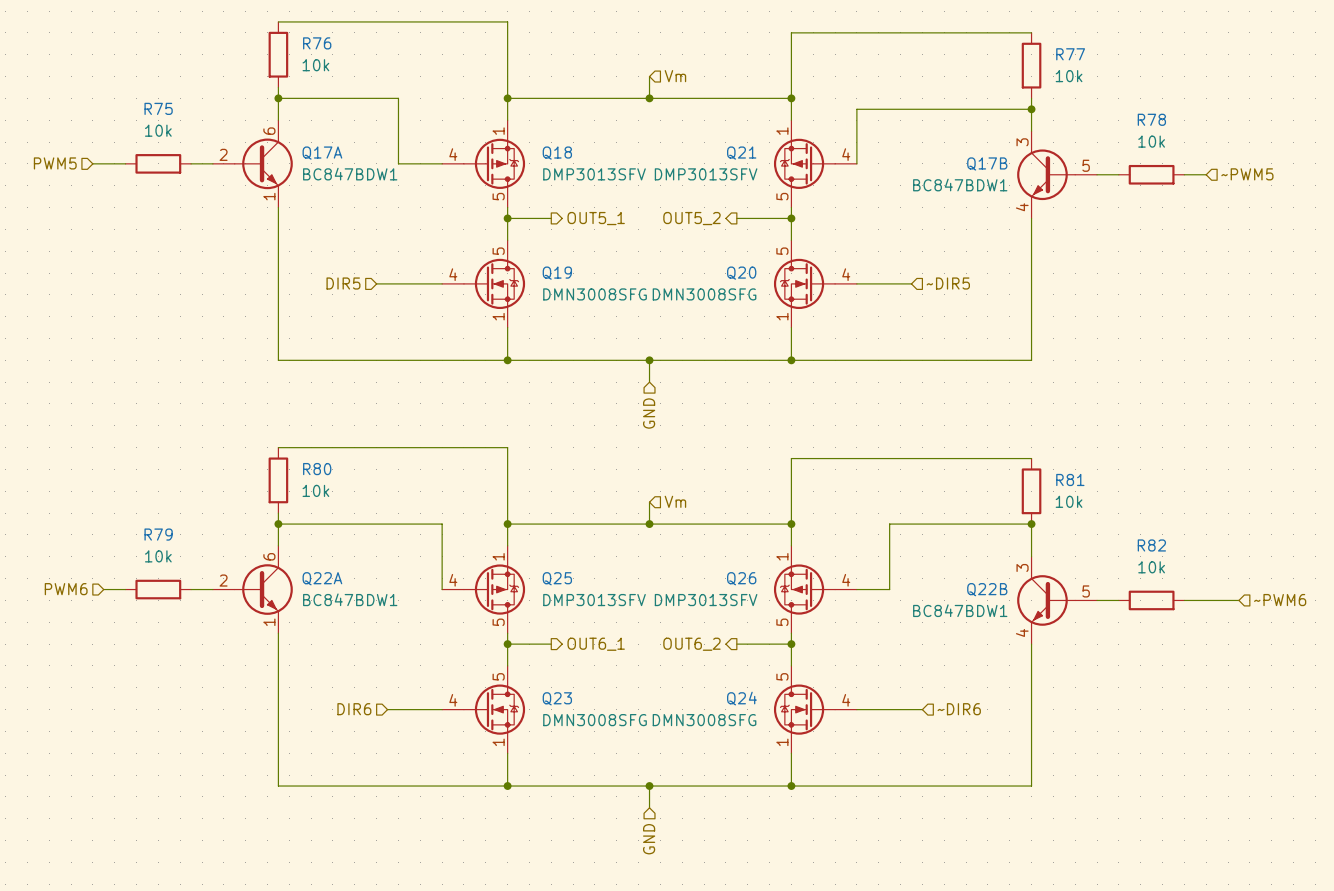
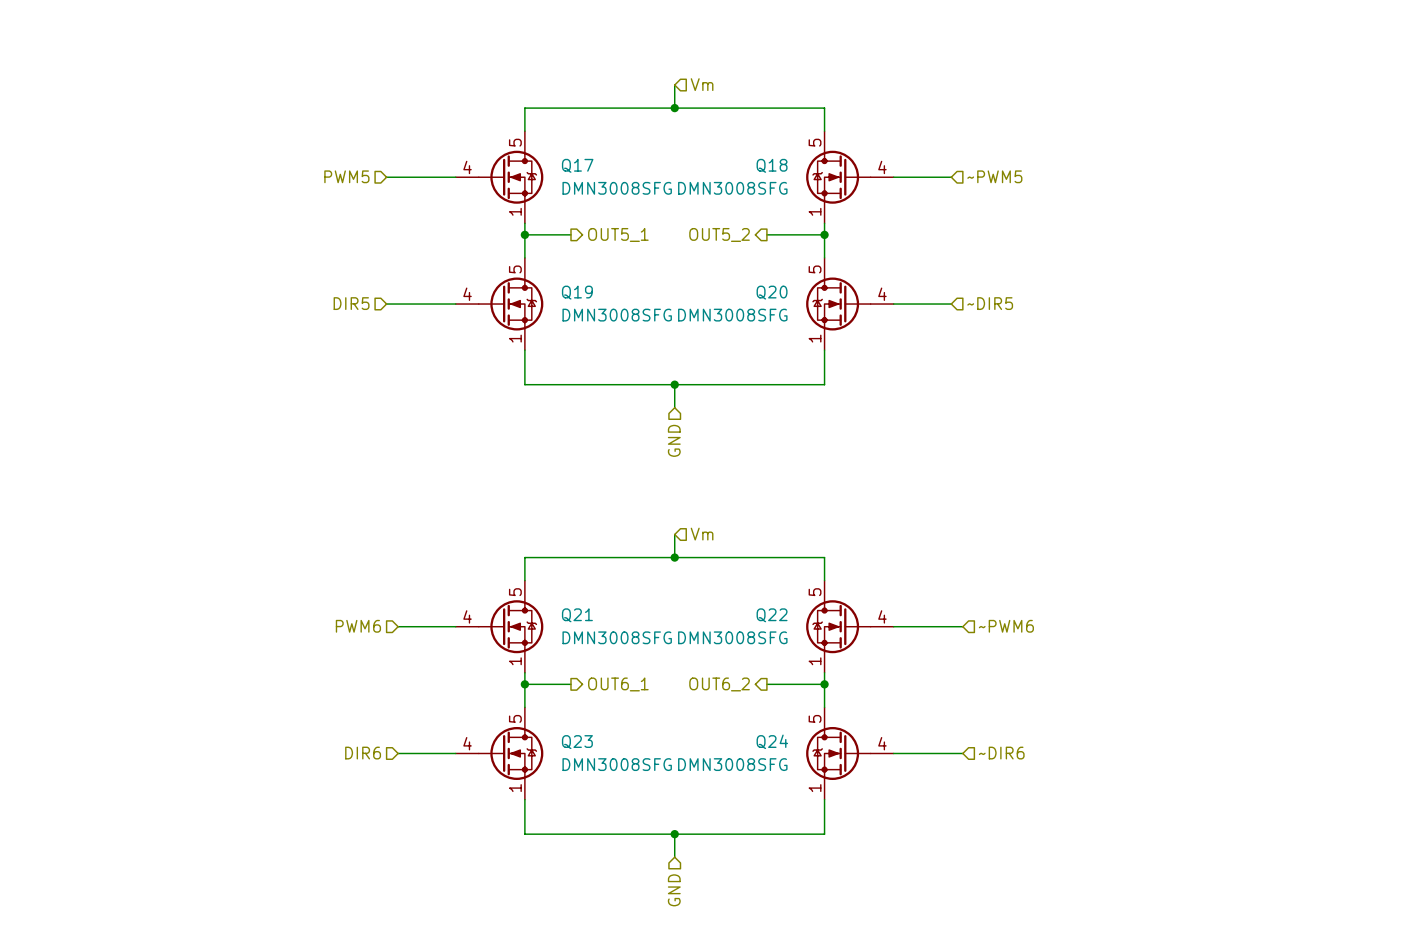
wire: (278, 21) (507, 21) (507, 98) -> none
wire: (1031, 32) (791, 32) (791, 98) -> none
R76: 10k (278, 54) -> none
R77: 10k (1031, 65) -> none
wire: (278, 87) (278, 120) -> none
wire: (278, 98) (398, 98) (398, 163) -> (386, 177) (409, 177)
junction: (278, 98) -> none
junction: (507, 98) -> none
junction: (791, 98) -> none
wire: (1031, 98) (1031, 131) -> none
wire: (1031, 109) (856, 109) (856, 163) -> (951, 177) (893, 177)
junction: (1031, 109) -> none
Q18 symbol: [442, 120, 526, 208] -> [806, 131, 894, 224]
Q21 symbol: [773, 120, 857, 208] -> [455, 580, 544, 673]
Q18 name position: Q18 (557, 153) -> Q18 (772, 165)
Q21 name position: Q21 (741, 153) -> Q21 (577, 615)
hierarchical label: PWM5 (55, 163) -> none
wire: (92, 163) (125, 163) -> none
R75: 10k (158, 163) -> none
wire: (191, 163) (212, 163) -> none
Q17A: BC847BDW1 (252, 163) -> none
hierarchical label: none -> PWM5 (346, 176)
Q17: none -> DMN3008SFG (499, 177)
hierarchical label: none -> ~PWM5 (994, 176)
Q18 value: DMP3013SFV (594, 174) -> DMN3008SFG (732, 188)
Q21 value: DMP3013SFV (706, 174) -> DMN3008SFG (617, 637)
Q17B: BC847BDW1 (1057, 174) -> none
wire: (1097, 174) (1118, 174) -> none
R78: 10k (1151, 174) -> none
wire: (1184, 174) (1206, 174) -> none
hierarchical label: ~PWM5 (1247, 174) -> none
wire: (278, 207) (278, 360) (507, 360) -> none
wire: (1031, 218) (1031, 360) (791, 360) -> none
junction: (507, 360) -> none
junction: (791, 360) -> none
wire: (278, 447) (507, 447) (507, 524) -> none
wire: (1031, 458) (791, 458) (791, 524) -> none
R80: 10k (278, 480) -> none
R81: 10k (1031, 491) -> none
wire: (278, 513) (278, 545) -> none
wire: (278, 524) (442, 524) (442, 589) -> (398, 626) (455, 626)
junction: (278, 524) -> none
junction: (507, 524) -> none
junction: (791, 524) -> none
junction: (1031, 524) -> none
wire: (1031, 556) (1031, 524) (889, 524) (889, 589) -> (962, 626) (928, 626)
hierarchical label: PWM6 (66, 589) -> none
wire: (103, 589) (125, 589) -> none
R79: 10k (158, 589) -> none
wire: (191, 589) (212, 589) -> none
Q22A: BC847BDW1 (252, 589) -> none
hierarchical label: none -> PWM6 (358, 626)
Q25: DMP3013SFV (483, 589) -> none
Q26: DMP3013SFV (815, 589) -> none
Q22: none -> DMN3008SFG (849, 626)
hierarchical label: none -> ~PWM6 (1006, 626)
Q22B: BC847BDW1 (1057, 600) -> none
wire: (1097, 600) (1118, 600) -> none
R82: 10k (1151, 600) -> none
wire: (1184, 600) (1238, 600) -> none
hierarchical label: ~PWM6 (1280, 600) -> none
wire: (278, 633) (278, 786) (507, 786) -> none
wire: (1031, 644) (1031, 786) (791, 786) -> none
junction: (507, 786) -> none
junction: (791, 786) -> none

